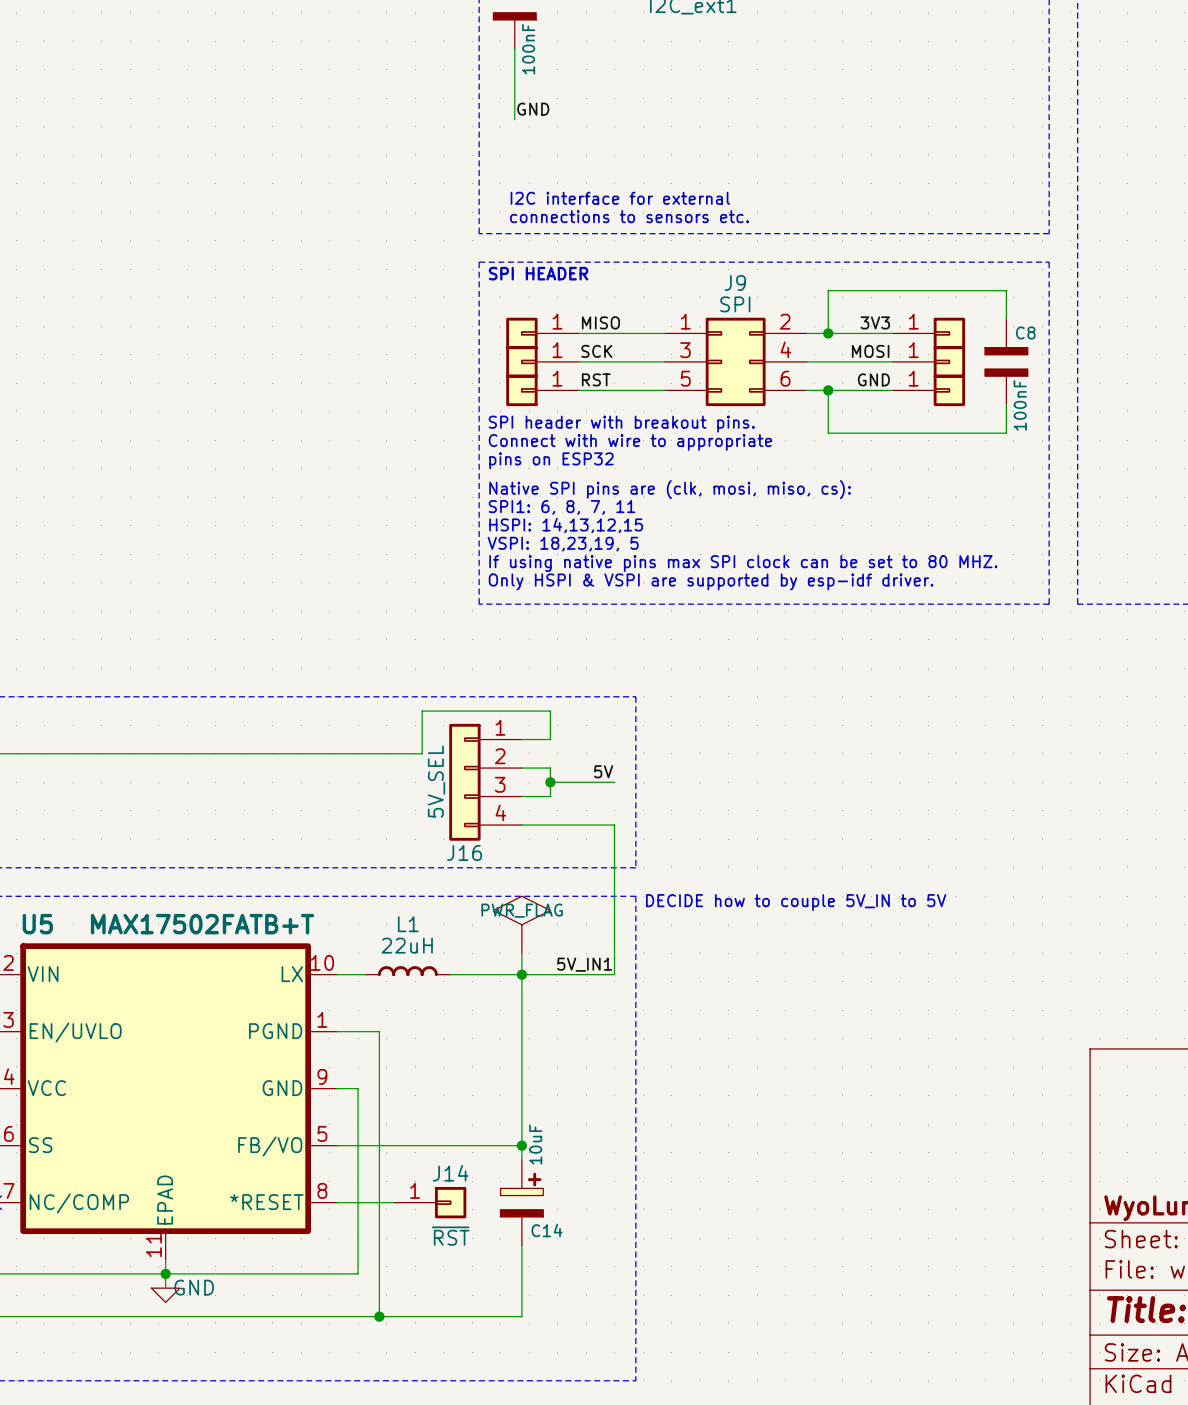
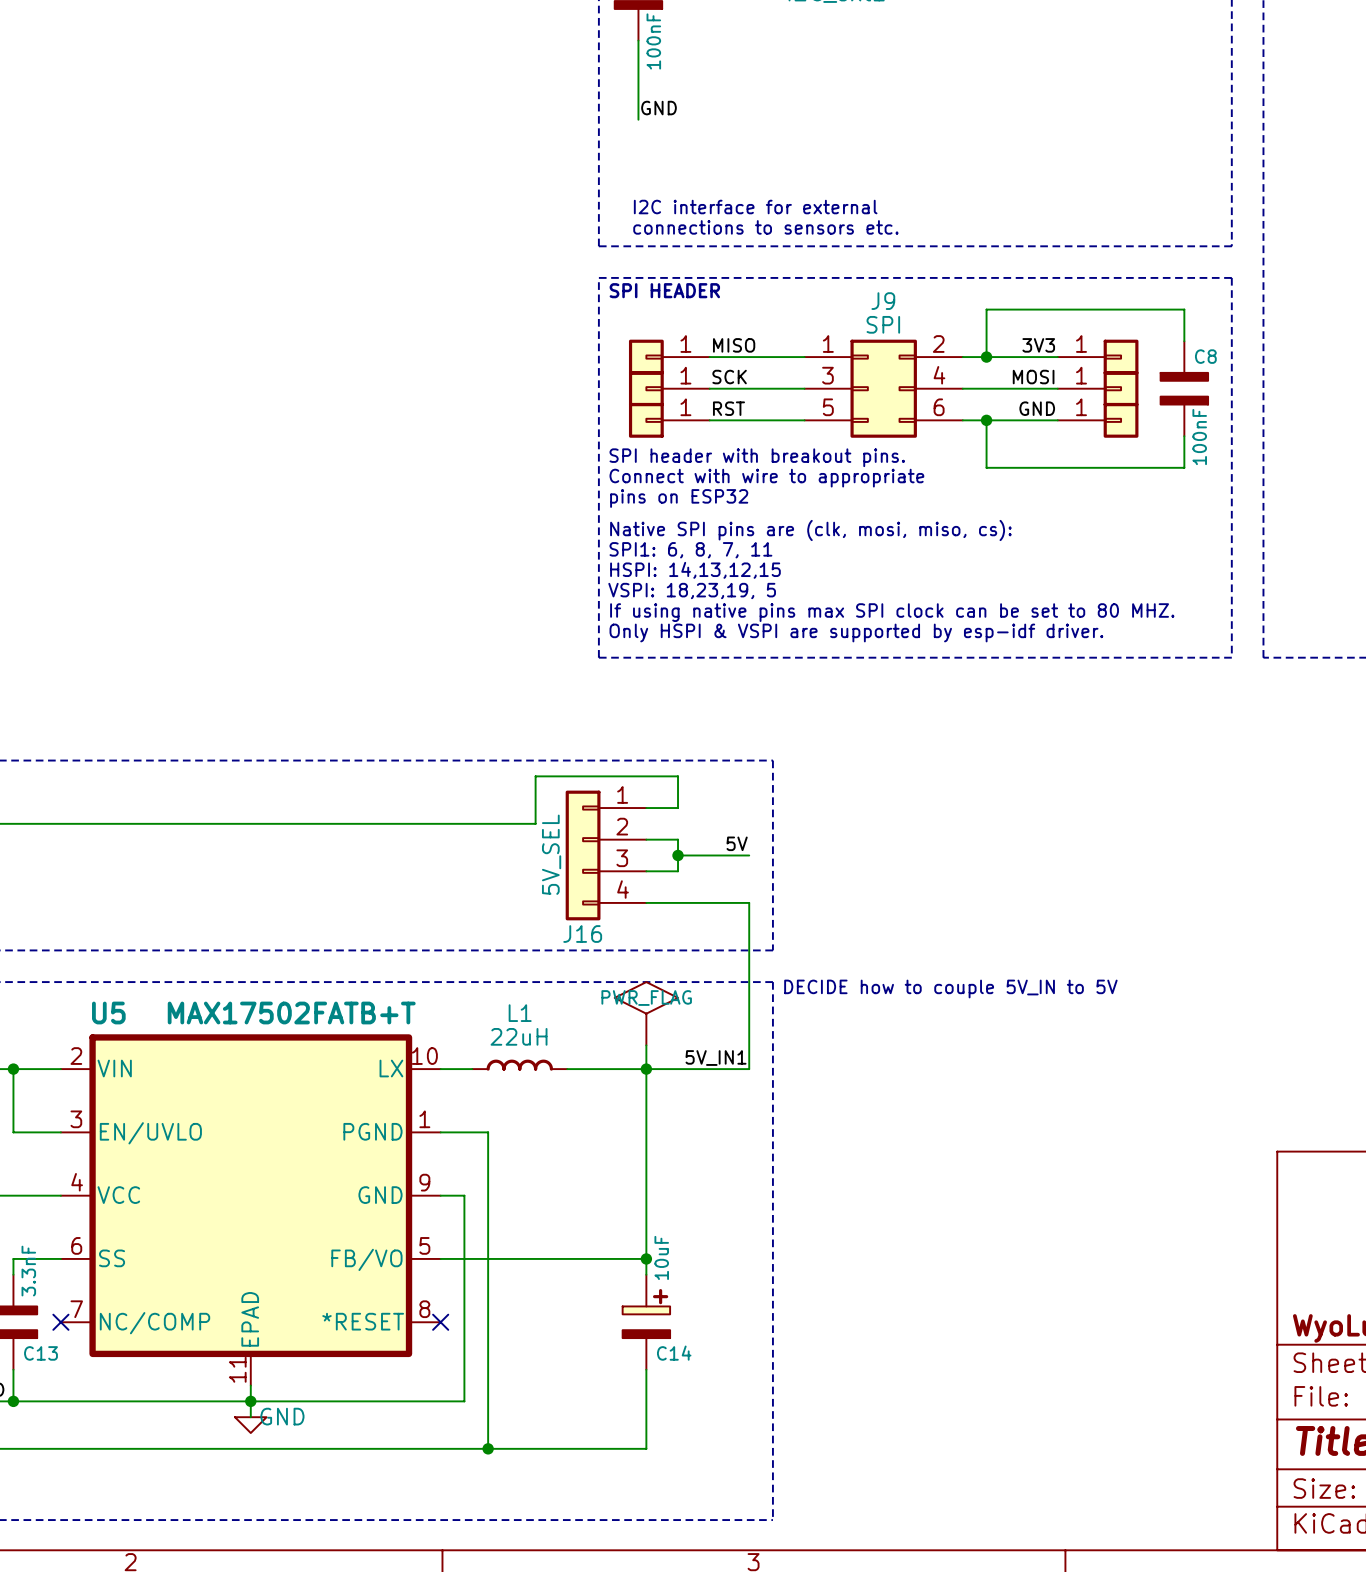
wire: (336, 1202) (393, 1202) -> none
no-connect mark: none -> (440, 1322)
J14: ~{RST} (429, 1202) -> none

